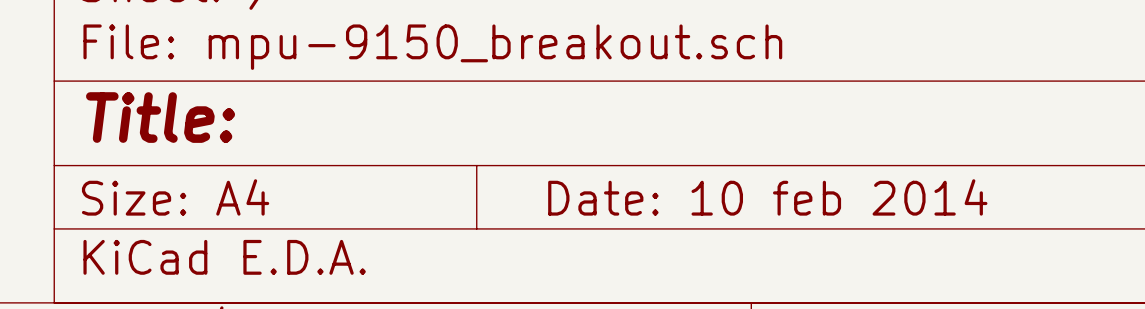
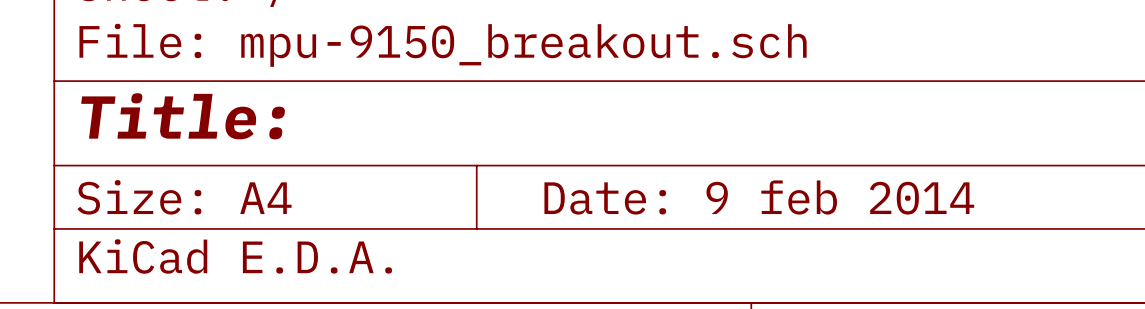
title block: Date: 10 feb 2014 (767, 197) -> Date: 9 feb 2014 (759, 197)

